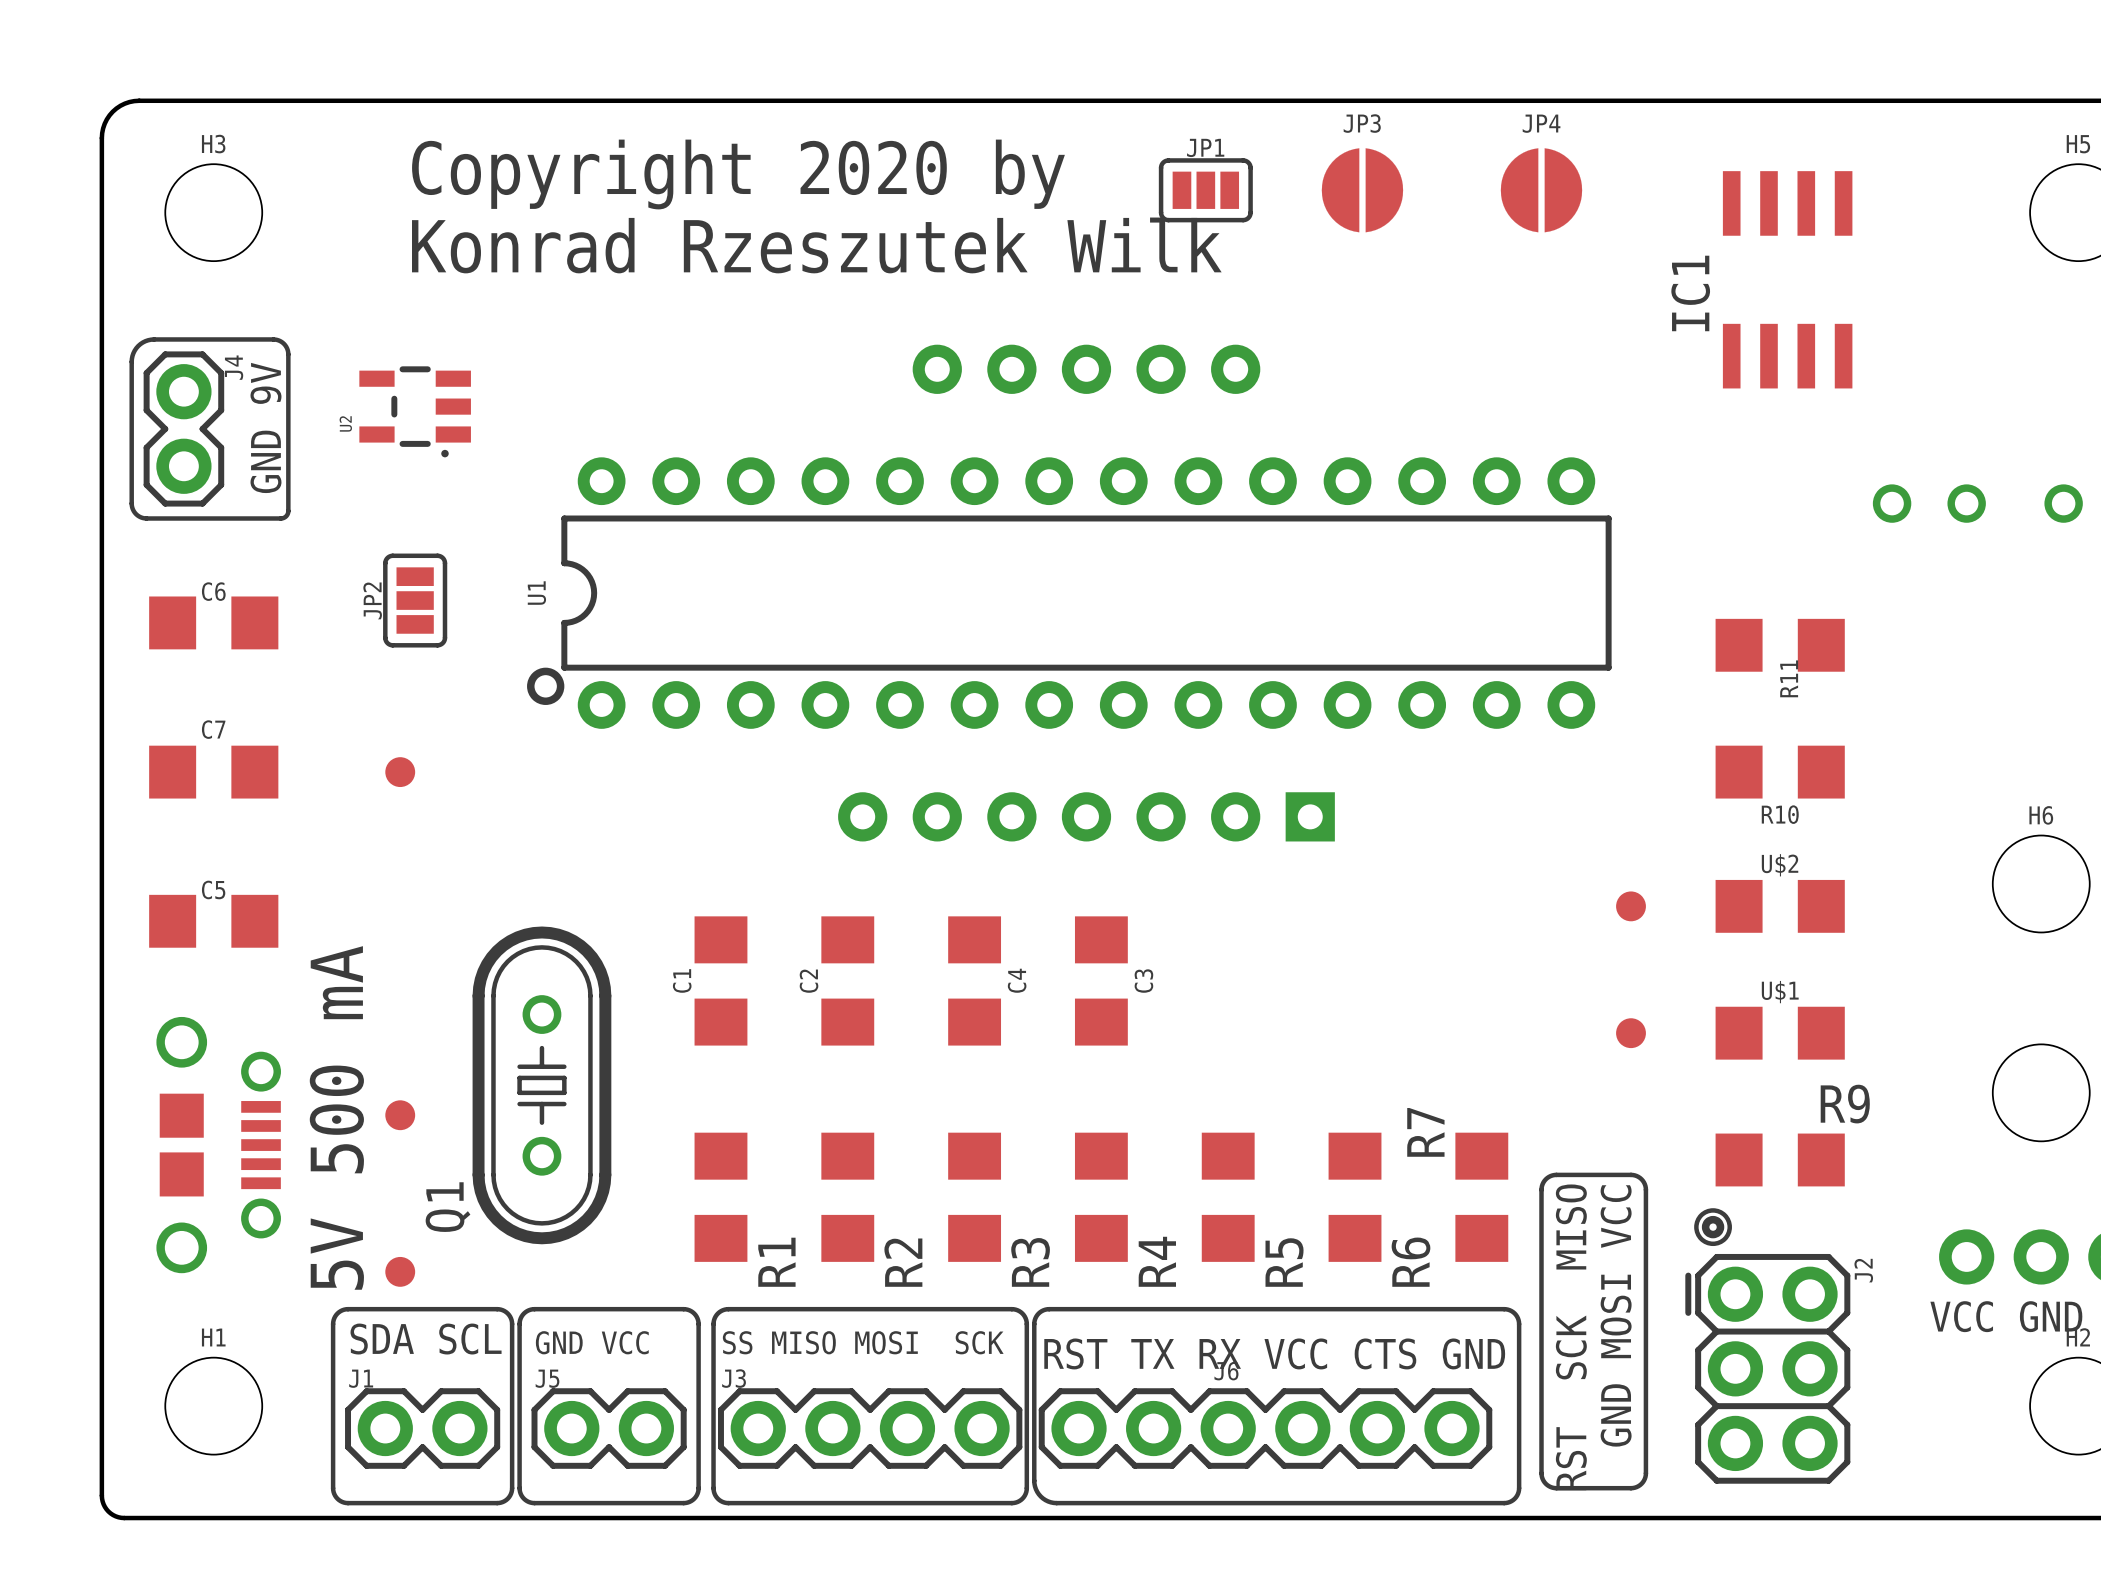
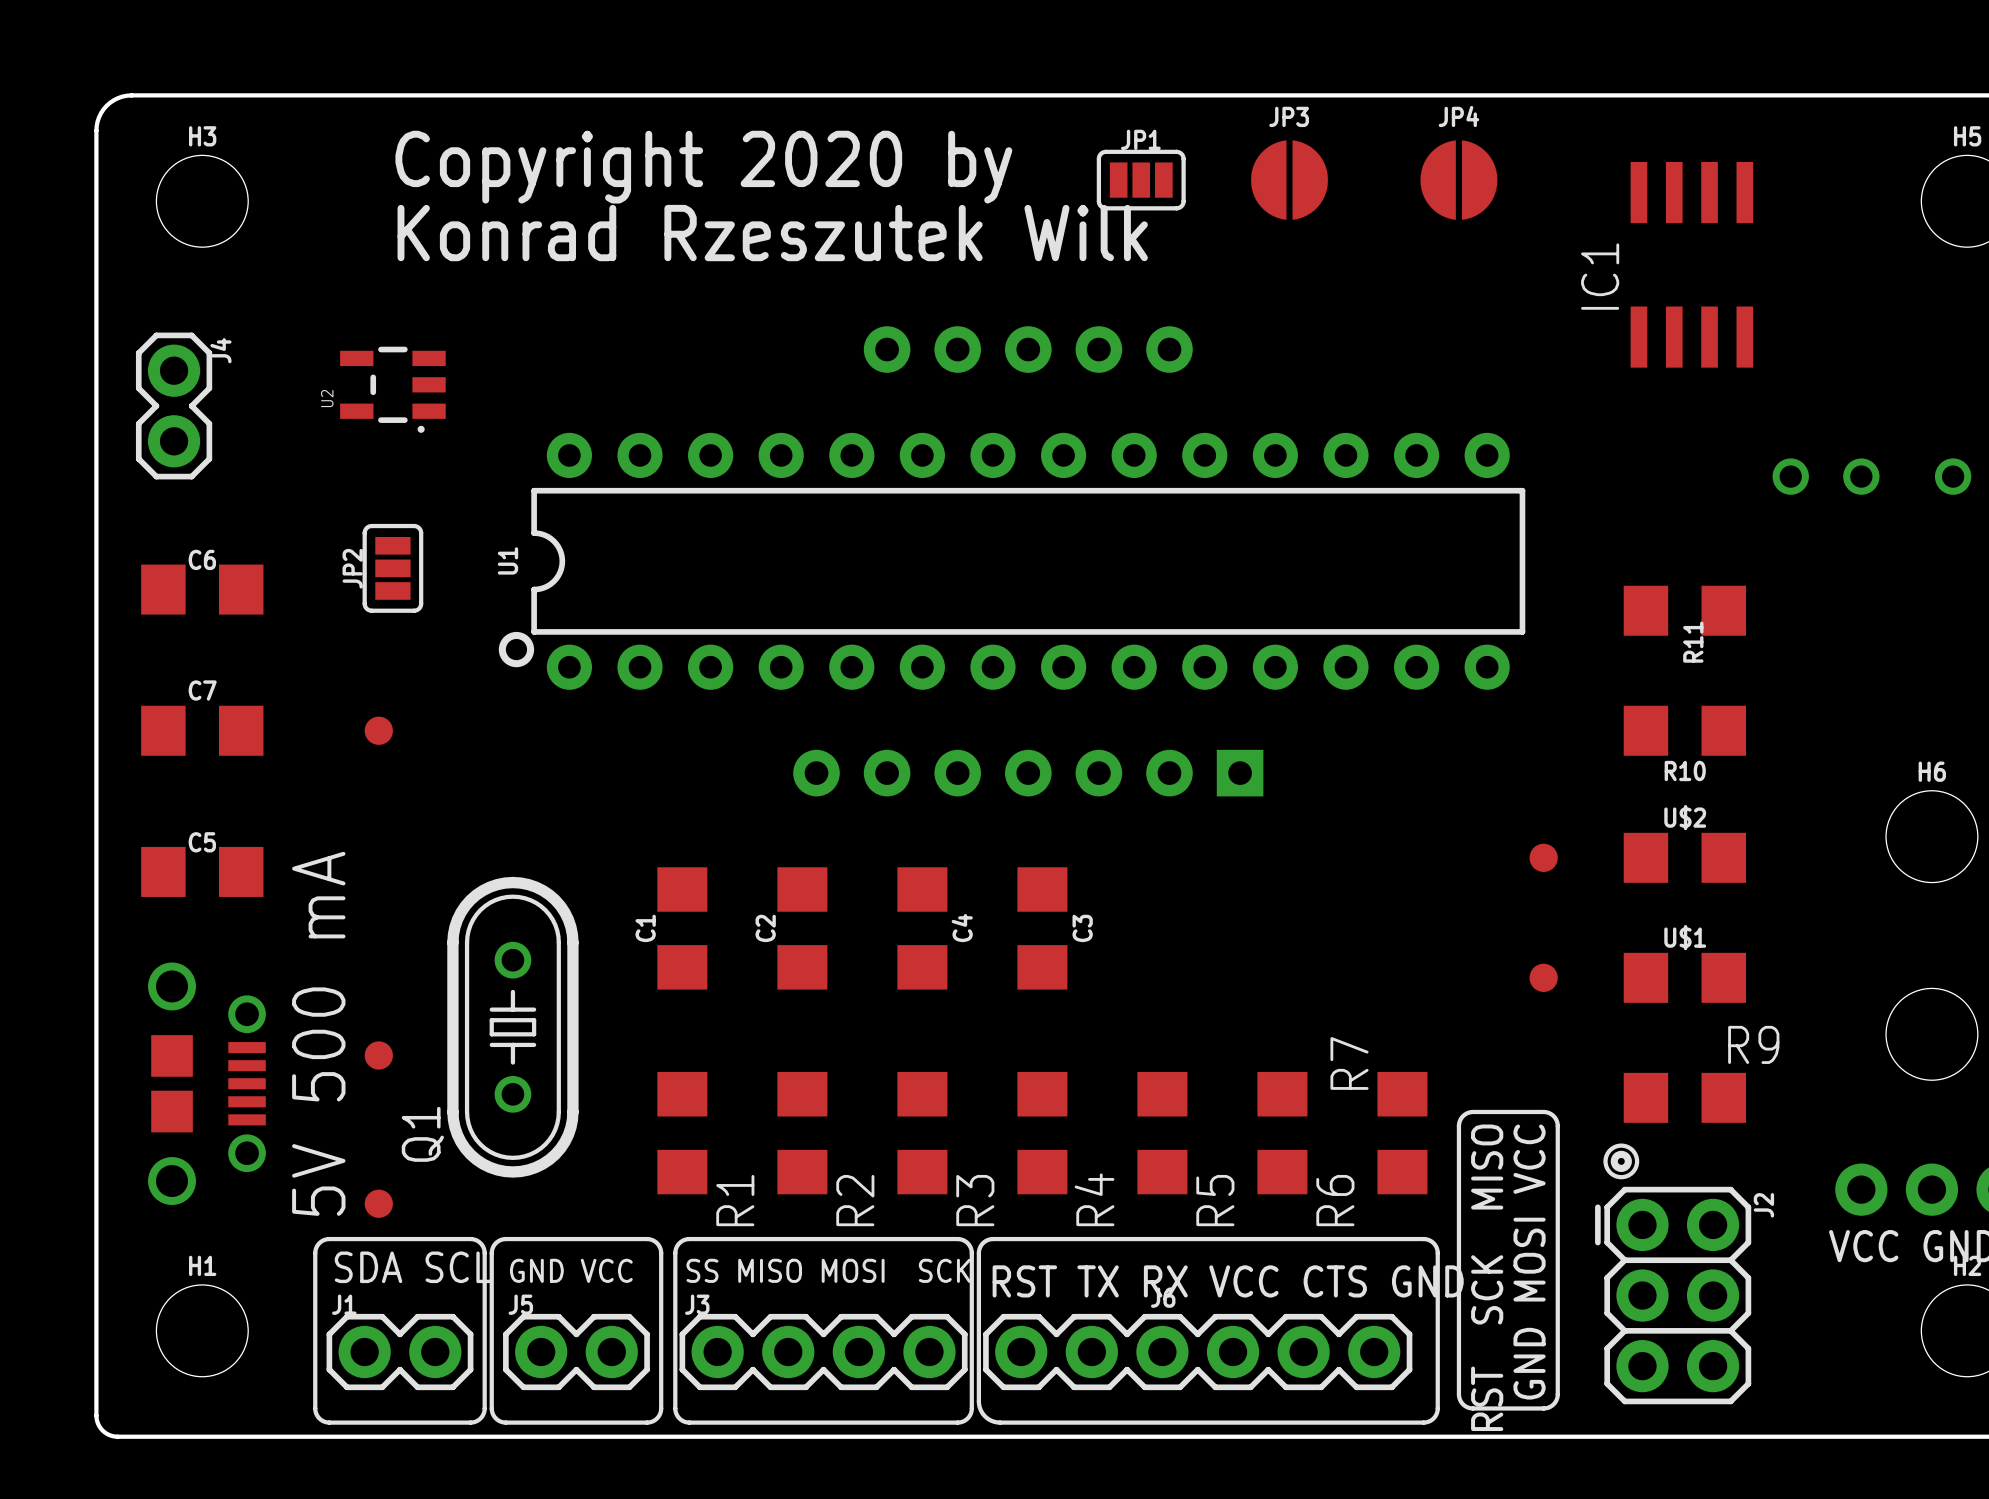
line: (154, 339) (273, 339) (279, 340) (285, 345) (288, 354) (288, 511) (285, 516) (146, 518) (140, 517) (134, 512) (131, 503) (131, 358) (134, 350) (140, 344) (154, 339) -> none
text: GND 9V (265, 427) -> none

